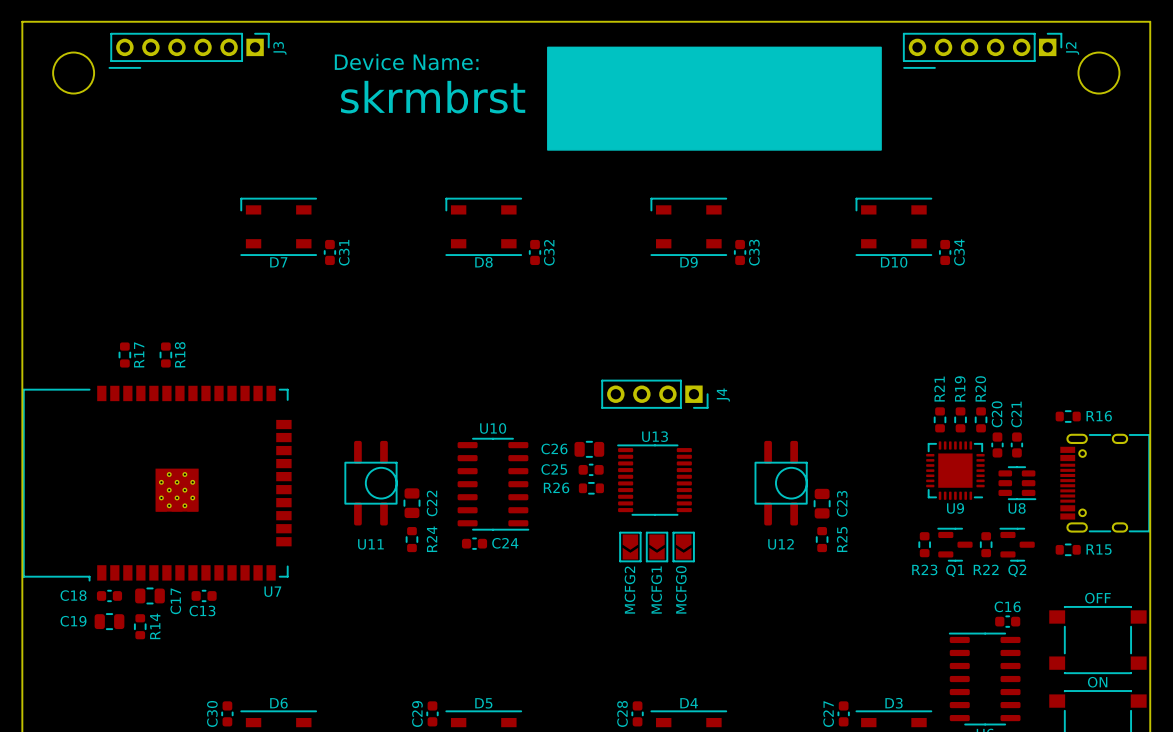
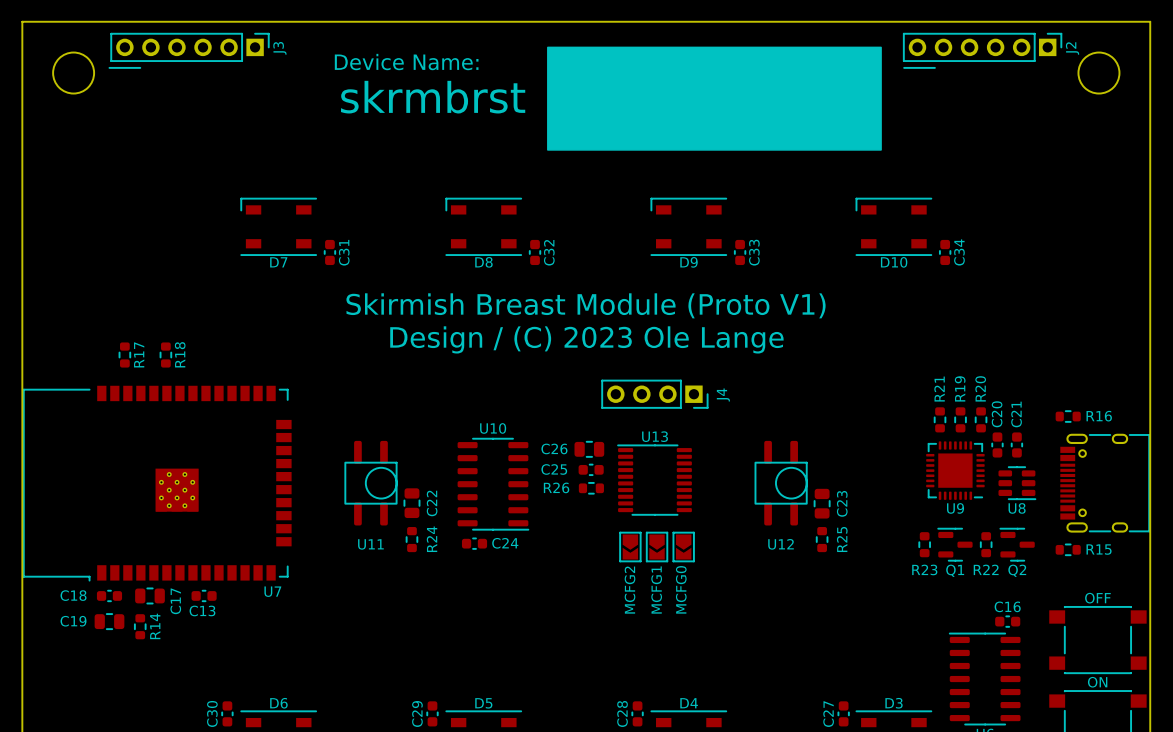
text: none -> Skirmish Breast Module (Proto V1) (586, 305)
text: none -> Design / (C) 2023 Ole Lange (586, 339)

